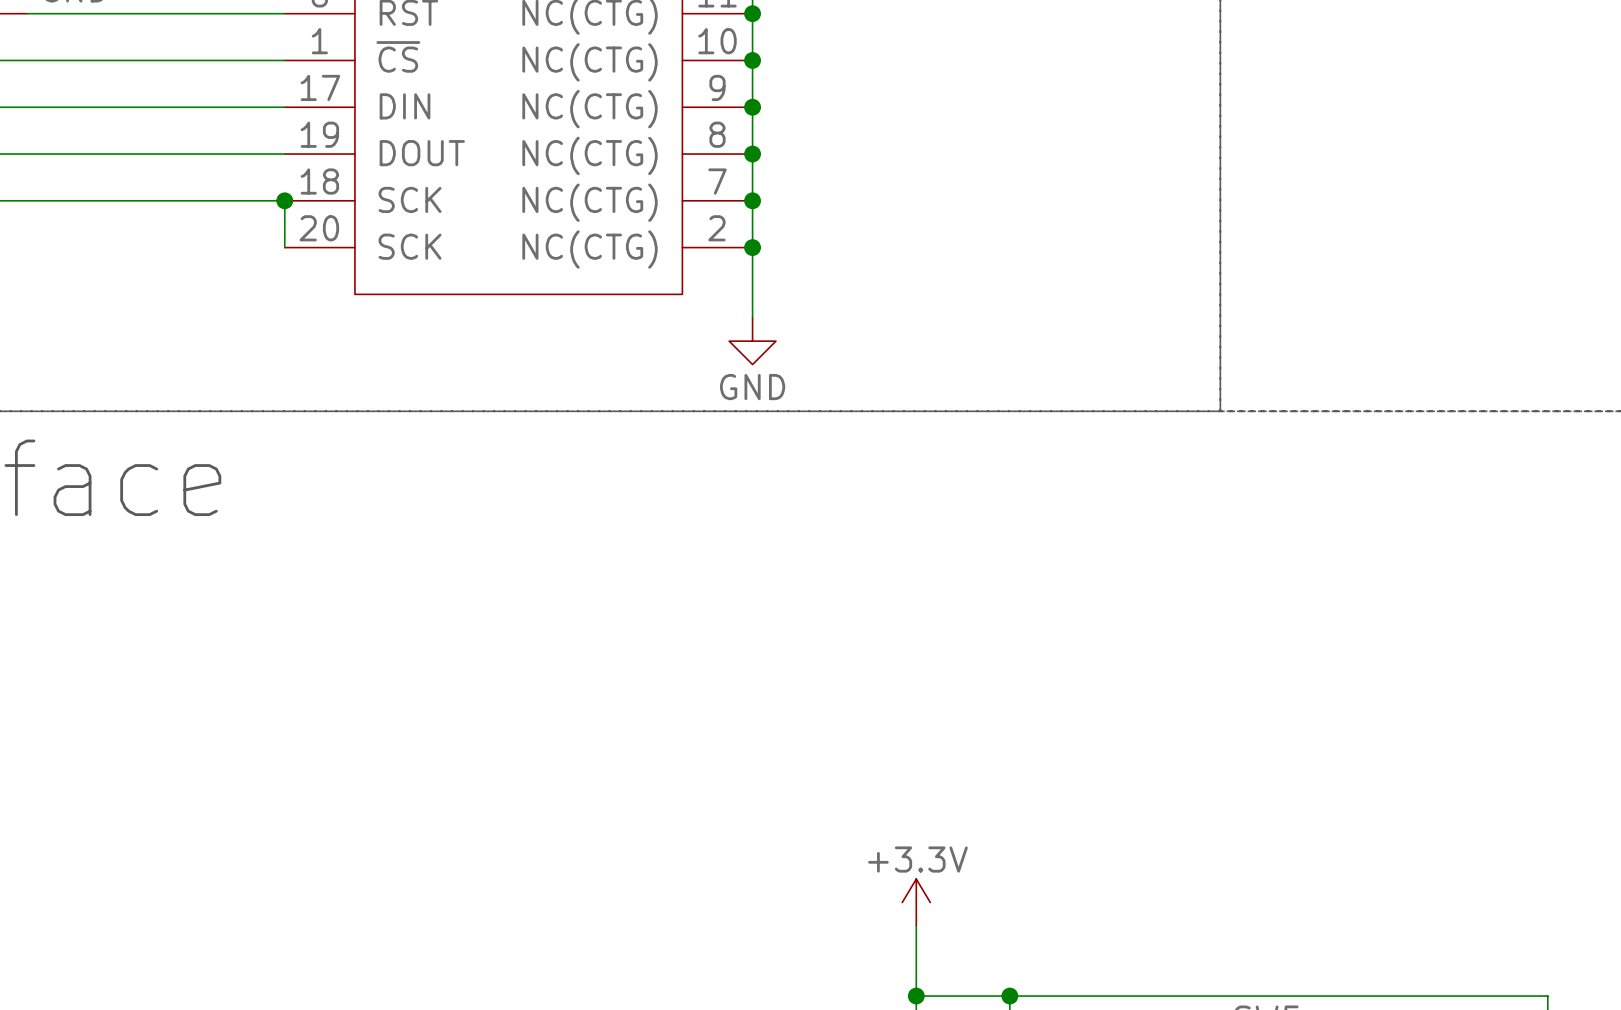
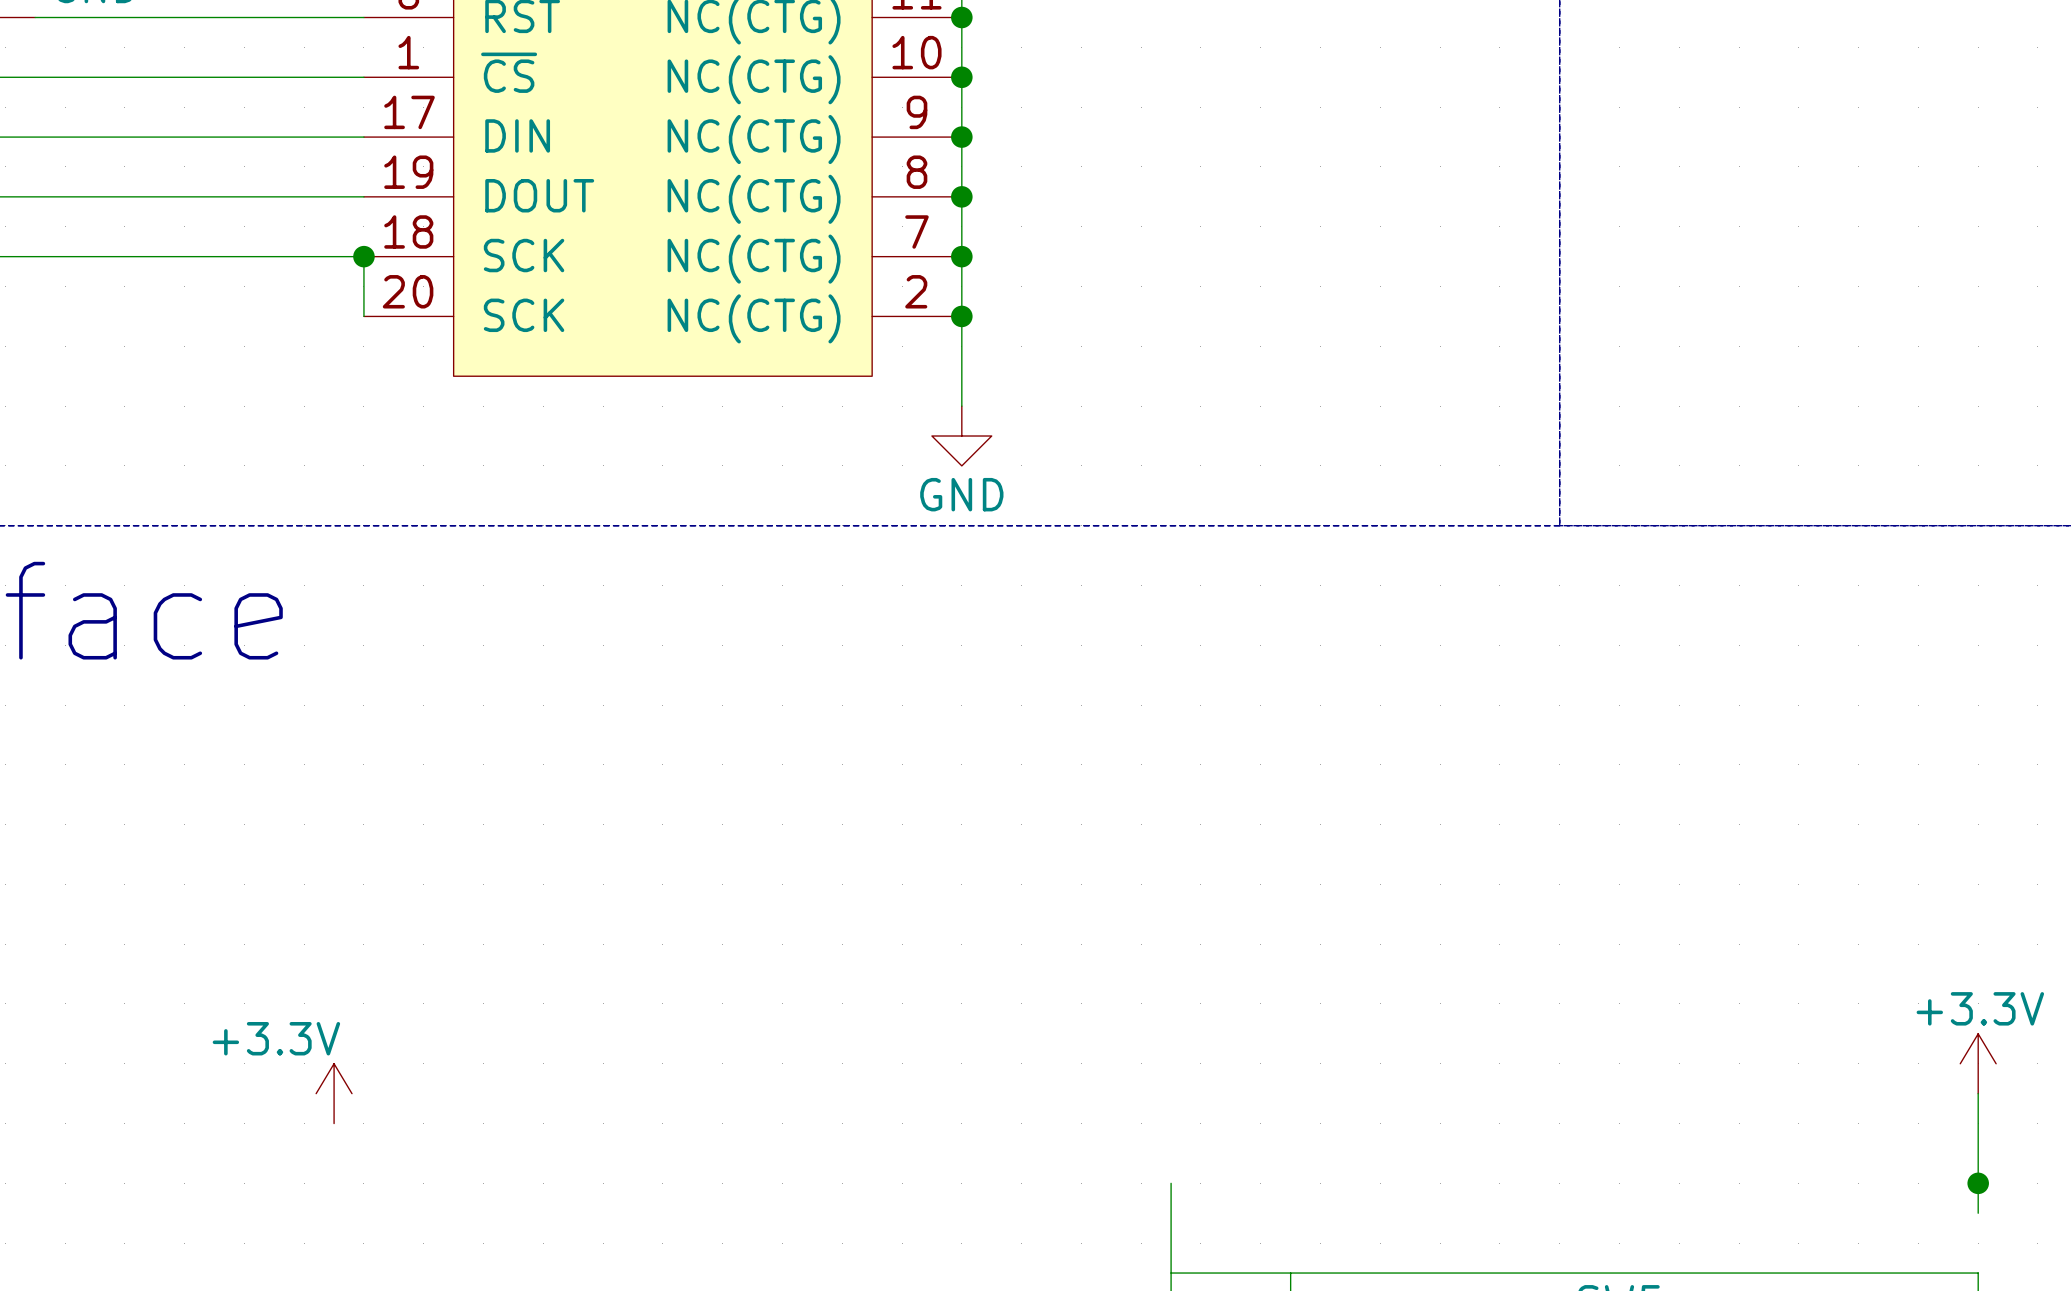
power symbol: none -> +3.3V (1978, 1063)
power symbol: none -> +3.3V (334, 1093)
wire: none -> (1978, 1093) (1978, 1213)
power symbol: +3.3V (916, 902) -> none
junction: none -> (1978, 1183)
junction: (916, 996) -> none
junction: (1009, 996) -> none

